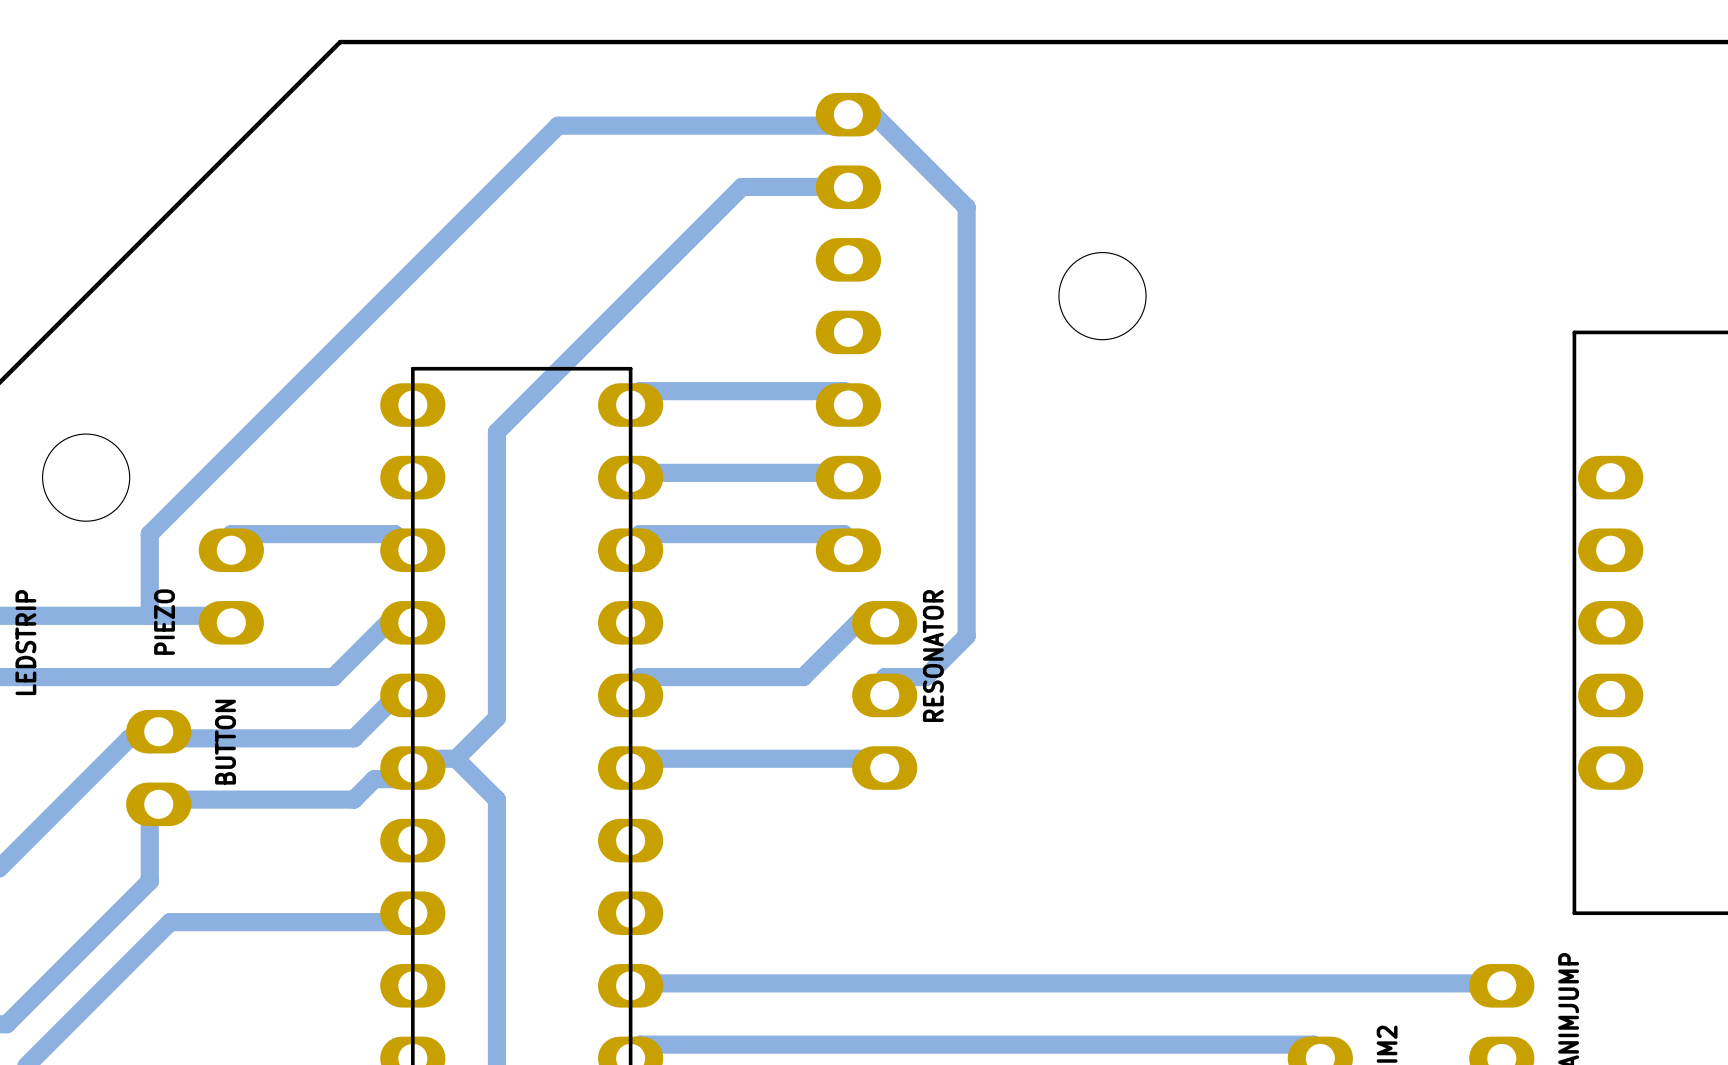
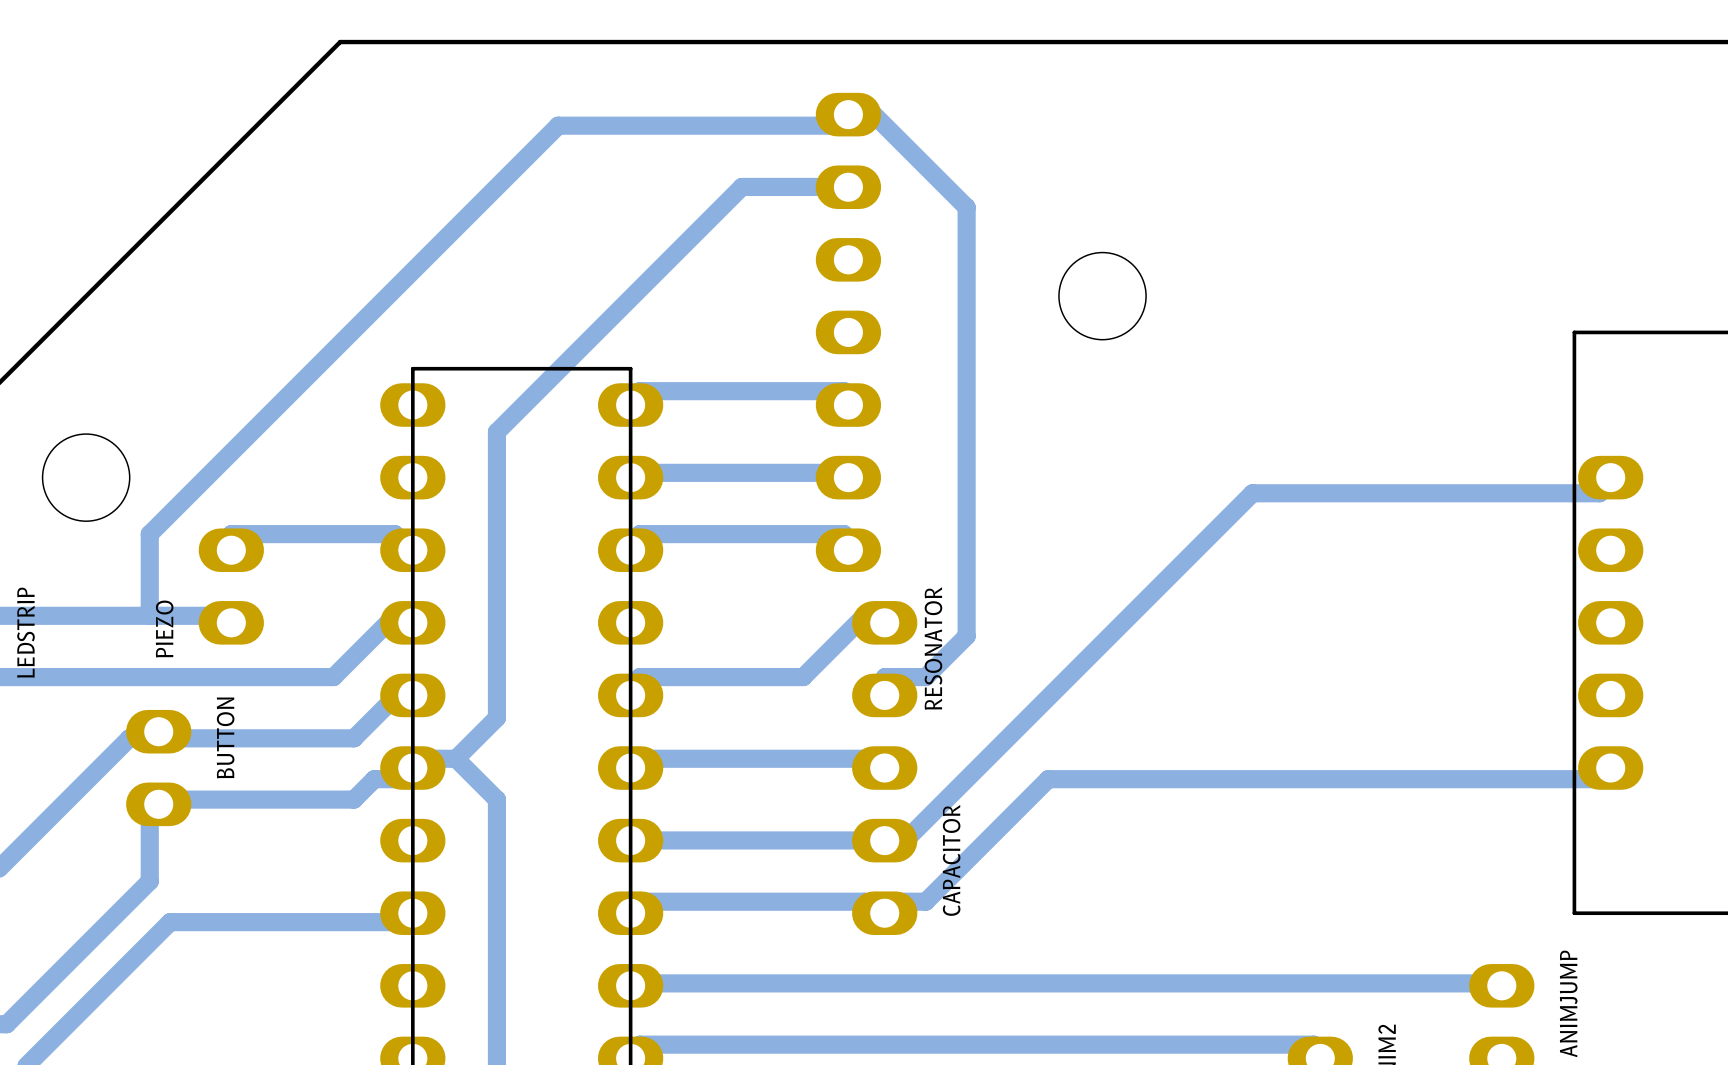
bottom track: none -> (1610, 477) (1599, 493) (1252, 493) (905, 840) (884, 840)
bottom track: none -> (1610, 768) (1599, 779) (1048, 779) (925, 901) (884, 901) (884, 913) (864, 901) (639, 901) (630, 913)
bottom track: none -> (630, 840) (884, 840)
CAPACITOR: none -> (884, 876)

